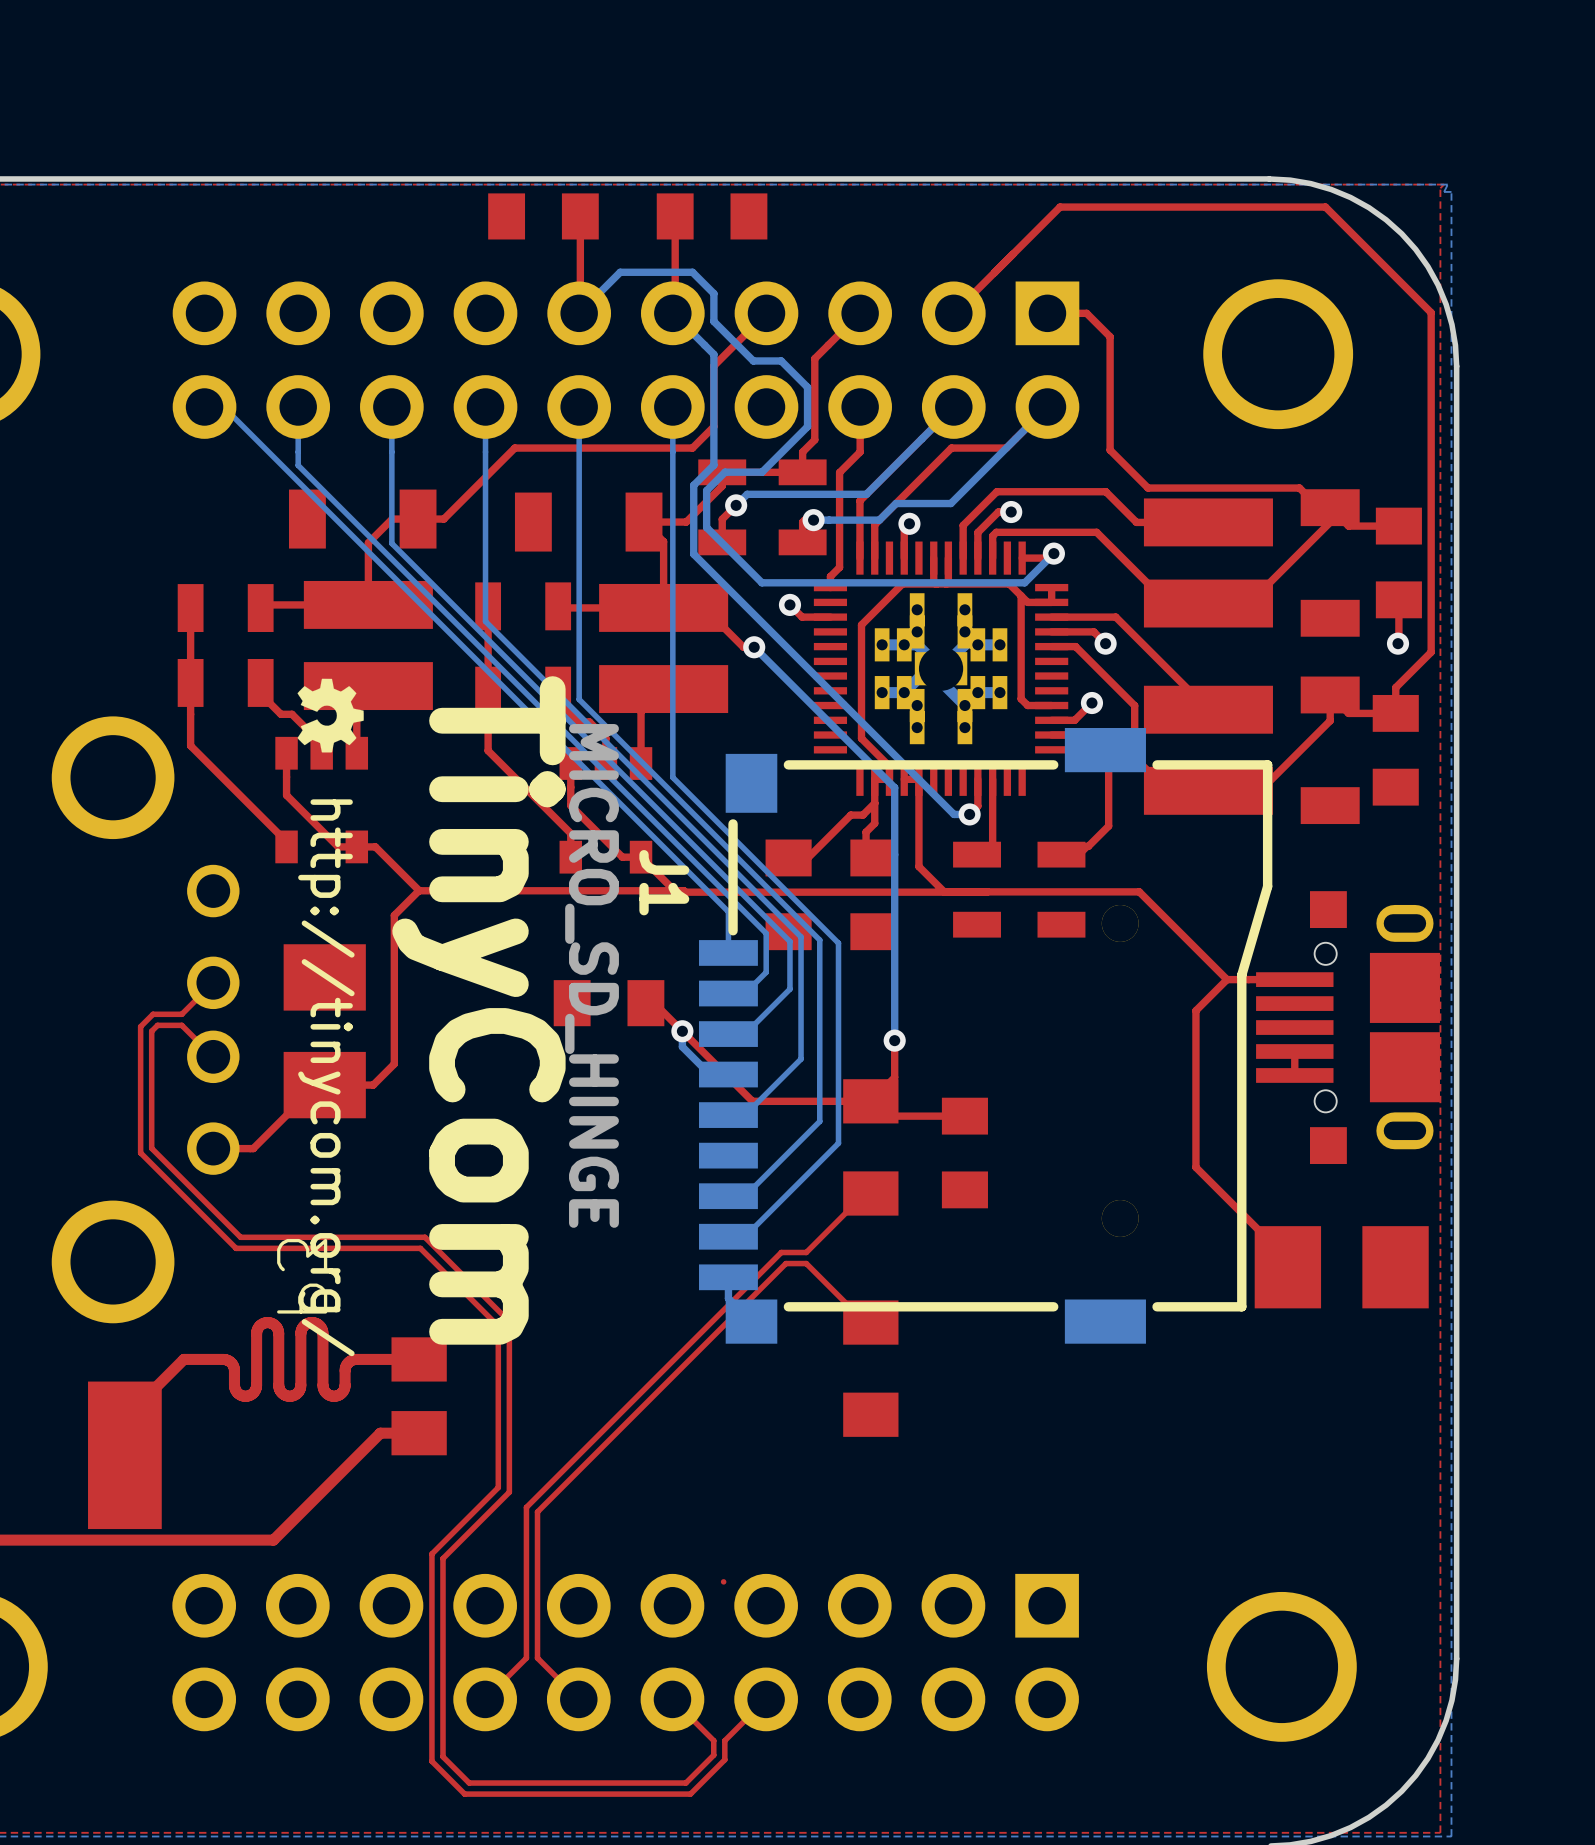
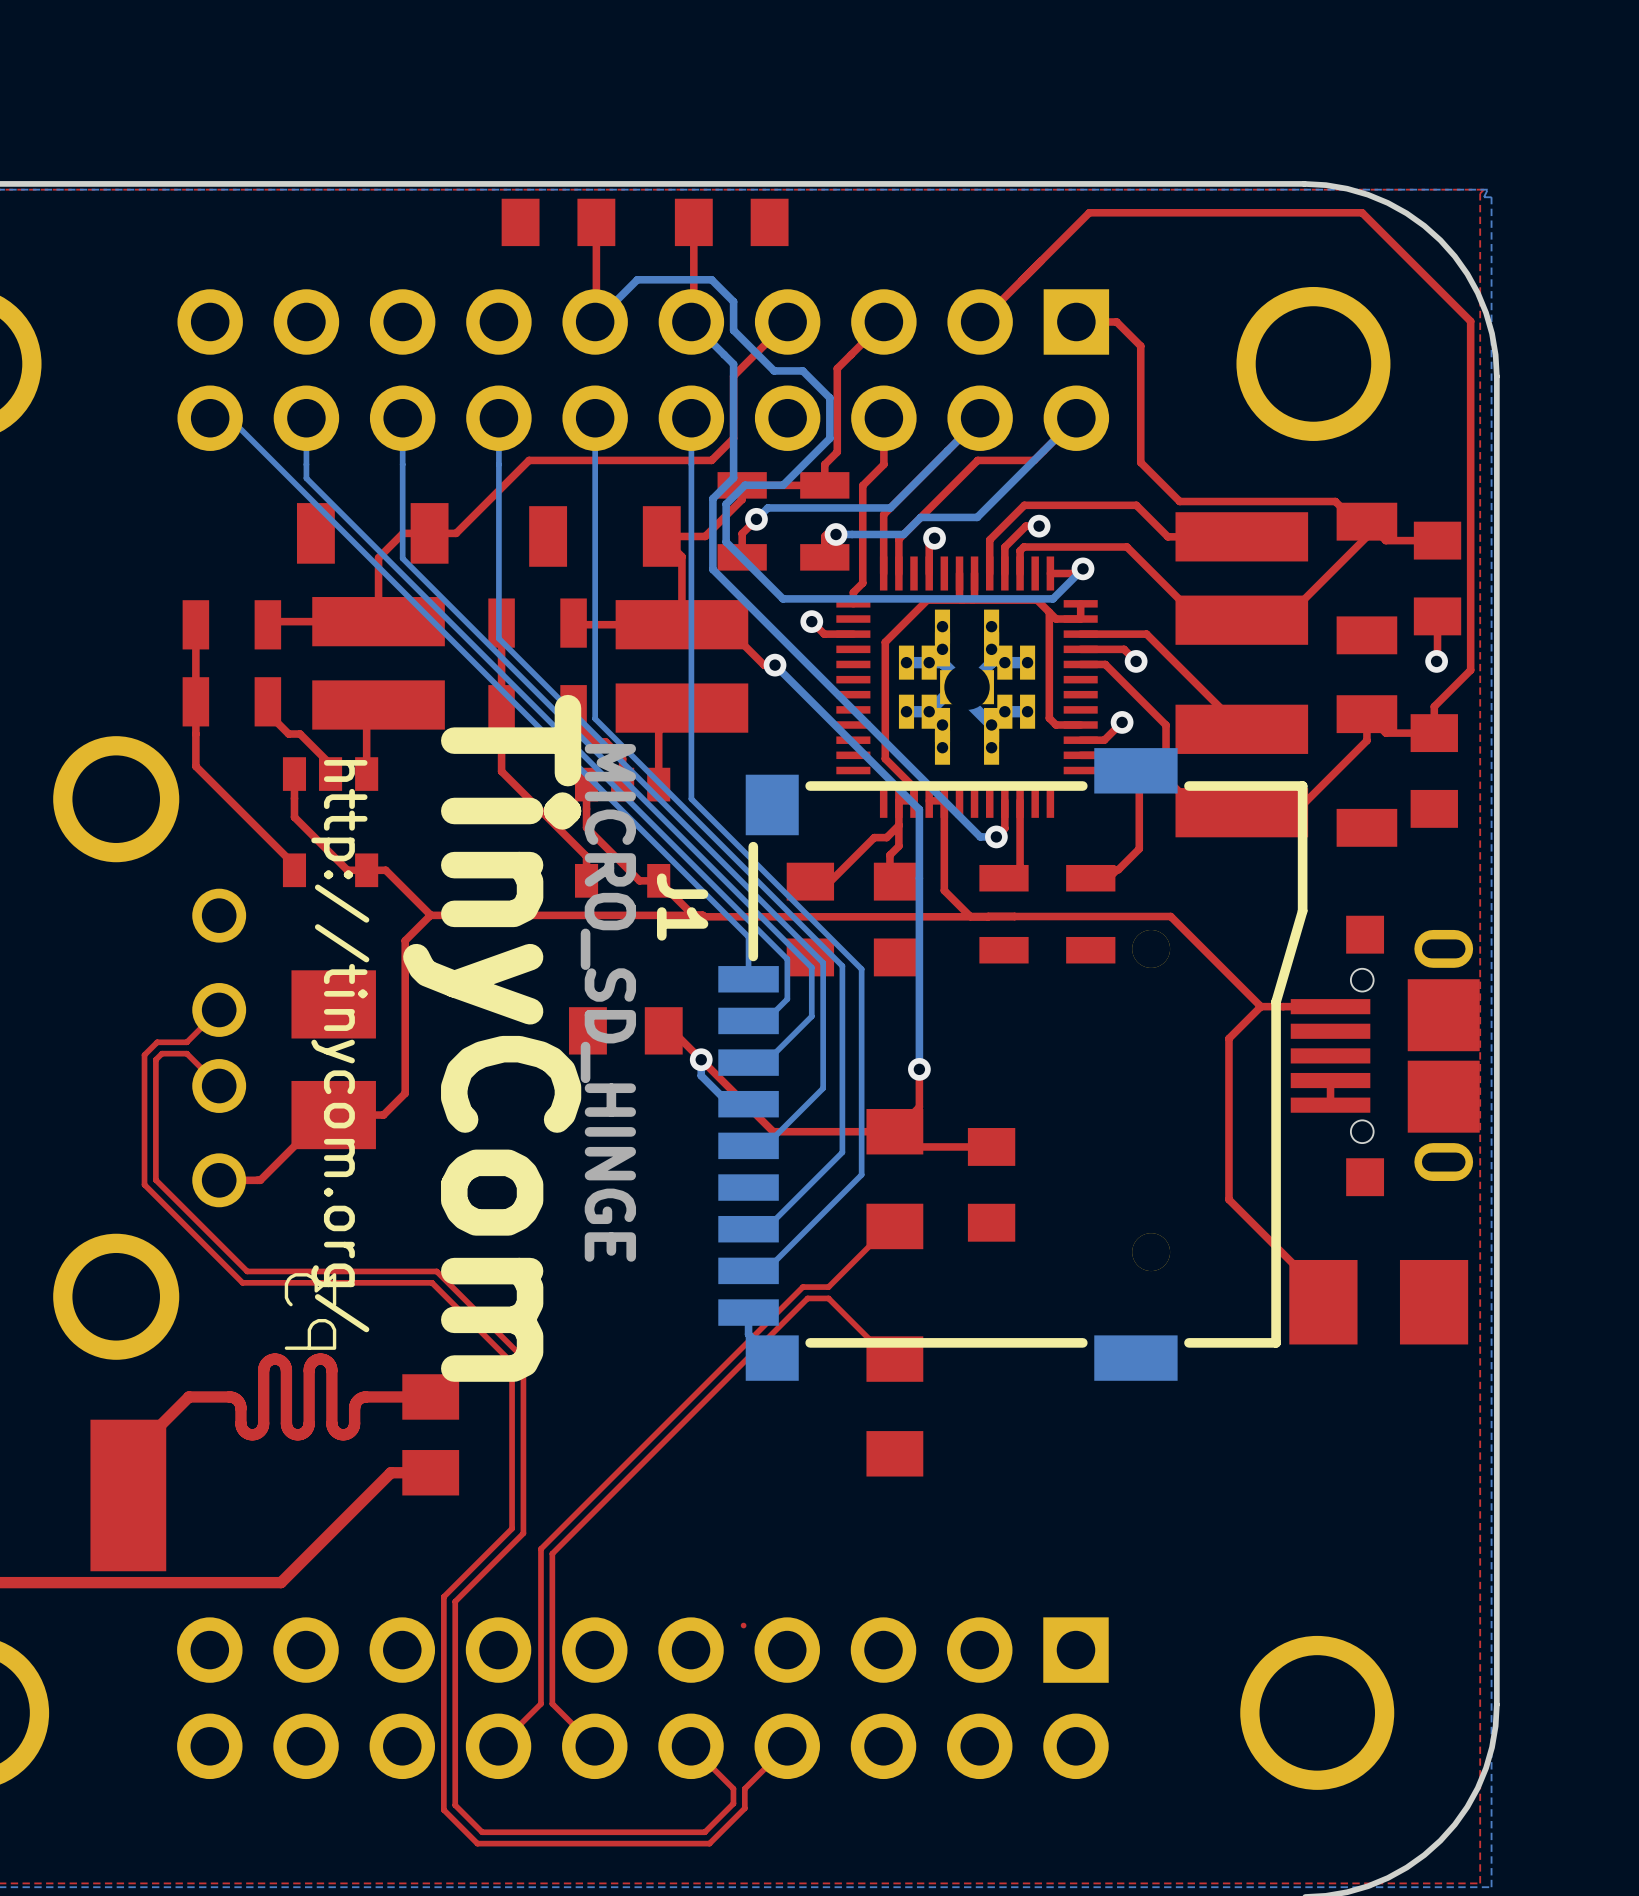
drawing: [297, 678, 364, 753] -> none
text position: http://tinycom.org/ (326, 1077) -> http://tinycom.org/ (340, 1046)

